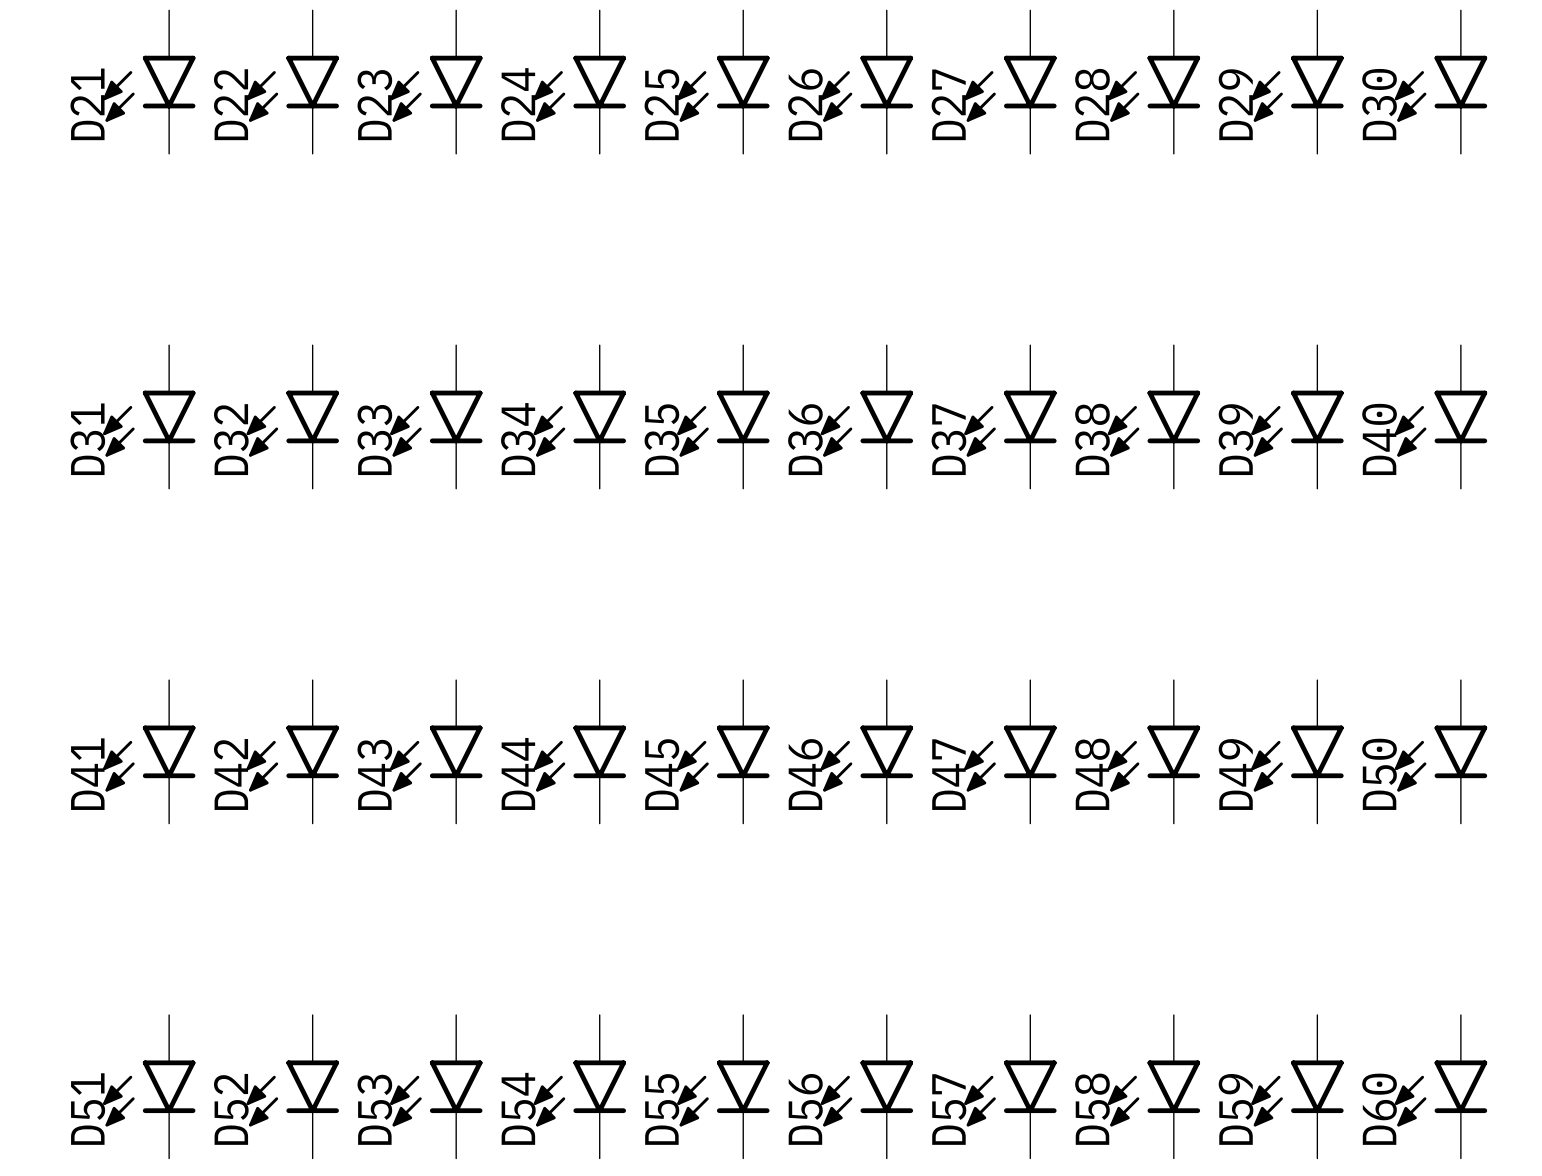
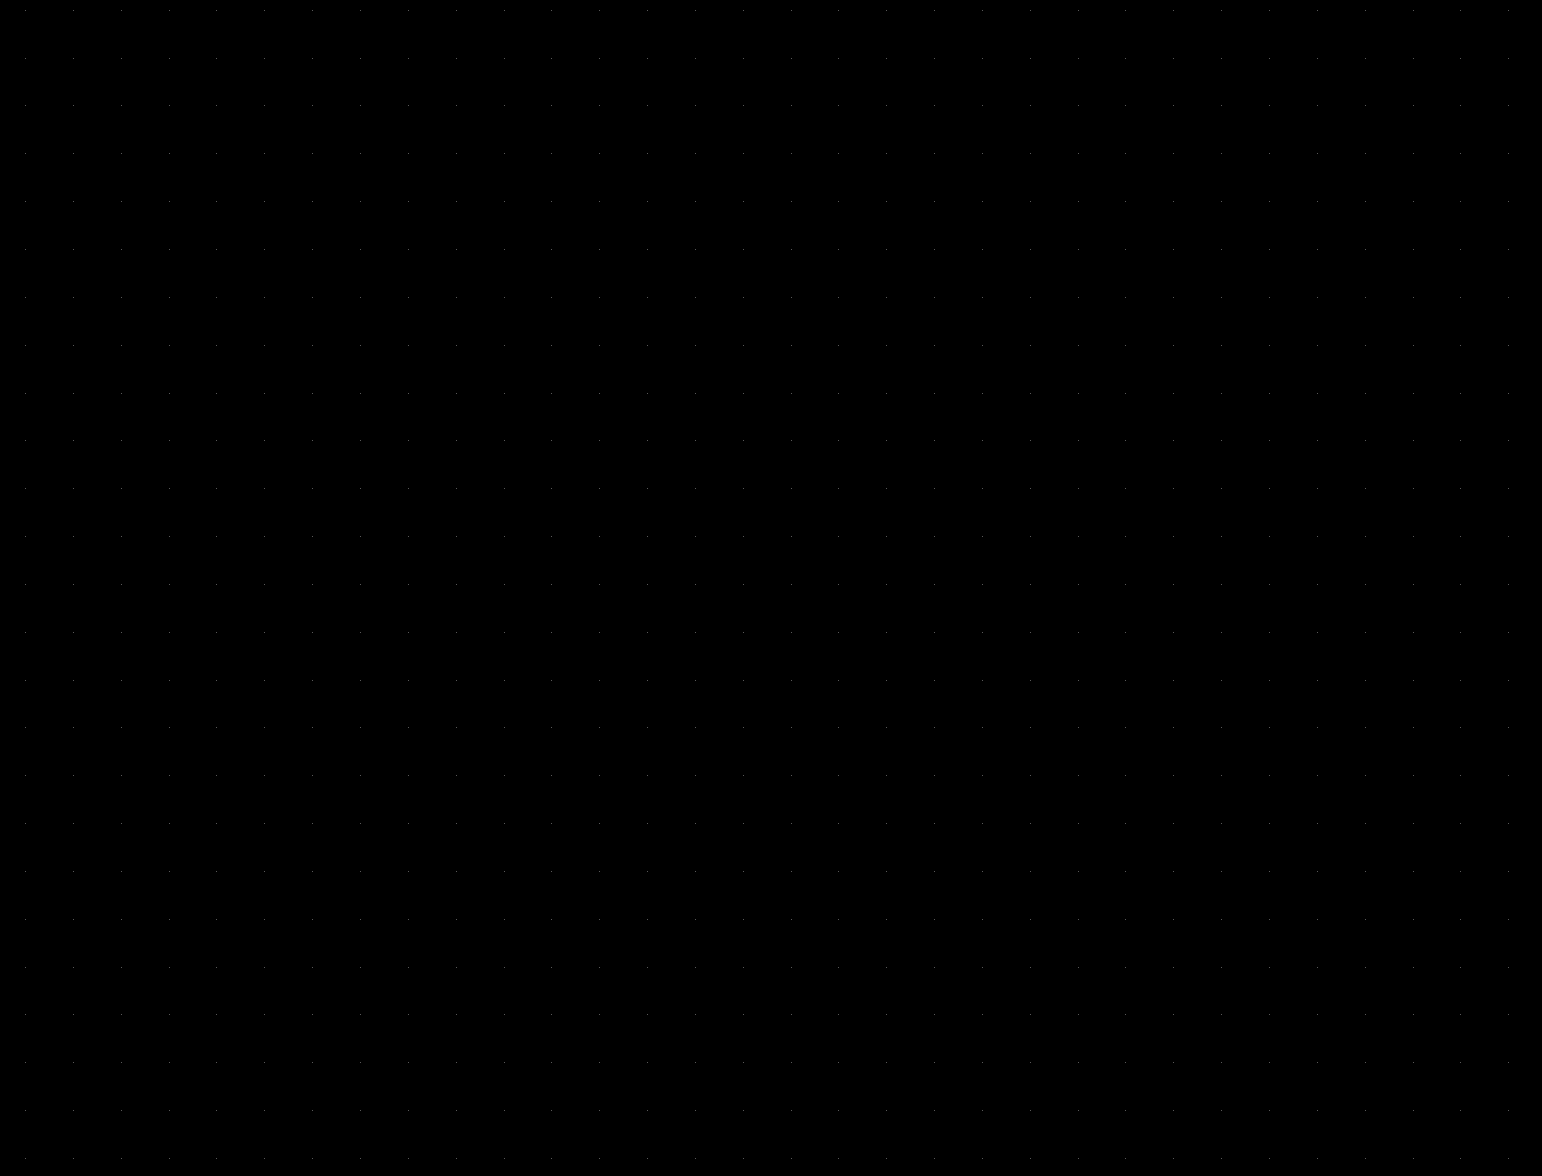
D21: (149, 82) -> none
D22: (292, 82) -> none
D23: (436, 82) -> none
D24: (579, 82) -> none
D25: (723, 82) -> none
D26: (866, 82) -> none
D27: (1010, 82) -> none
D28: (1153, 82) -> none
D29: (1297, 82) -> none
D30: (1441, 82) -> none
D31: (149, 416) -> none
D32: (292, 416) -> none
D33: (436, 416) -> none
D34: (579, 416) -> none
D35: (723, 416) -> none
D36: (866, 416) -> none
D37: (1010, 416) -> none
D38: (1153, 416) -> none
D39: (1297, 416) -> none
D40: (1441, 416) -> none
D41: (149, 751) -> none
D42: (292, 751) -> none
D43: (436, 751) -> none
D44: (579, 751) -> none
D45: (723, 751) -> none
D46: (866, 751) -> none
D47: (1010, 751) -> none
D48: (1153, 751) -> none
D49: (1297, 751) -> none
D50: (1441, 751) -> none
D51: (149, 1086) -> none
D52: (292, 1086) -> none
D53: (436, 1086) -> none
D54: (579, 1086) -> none
D55: (723, 1086) -> none
D56: (866, 1086) -> none
D57: (1010, 1086) -> none
D58: (1153, 1086) -> none
D59: (1297, 1086) -> none
D60: (1441, 1086) -> none

